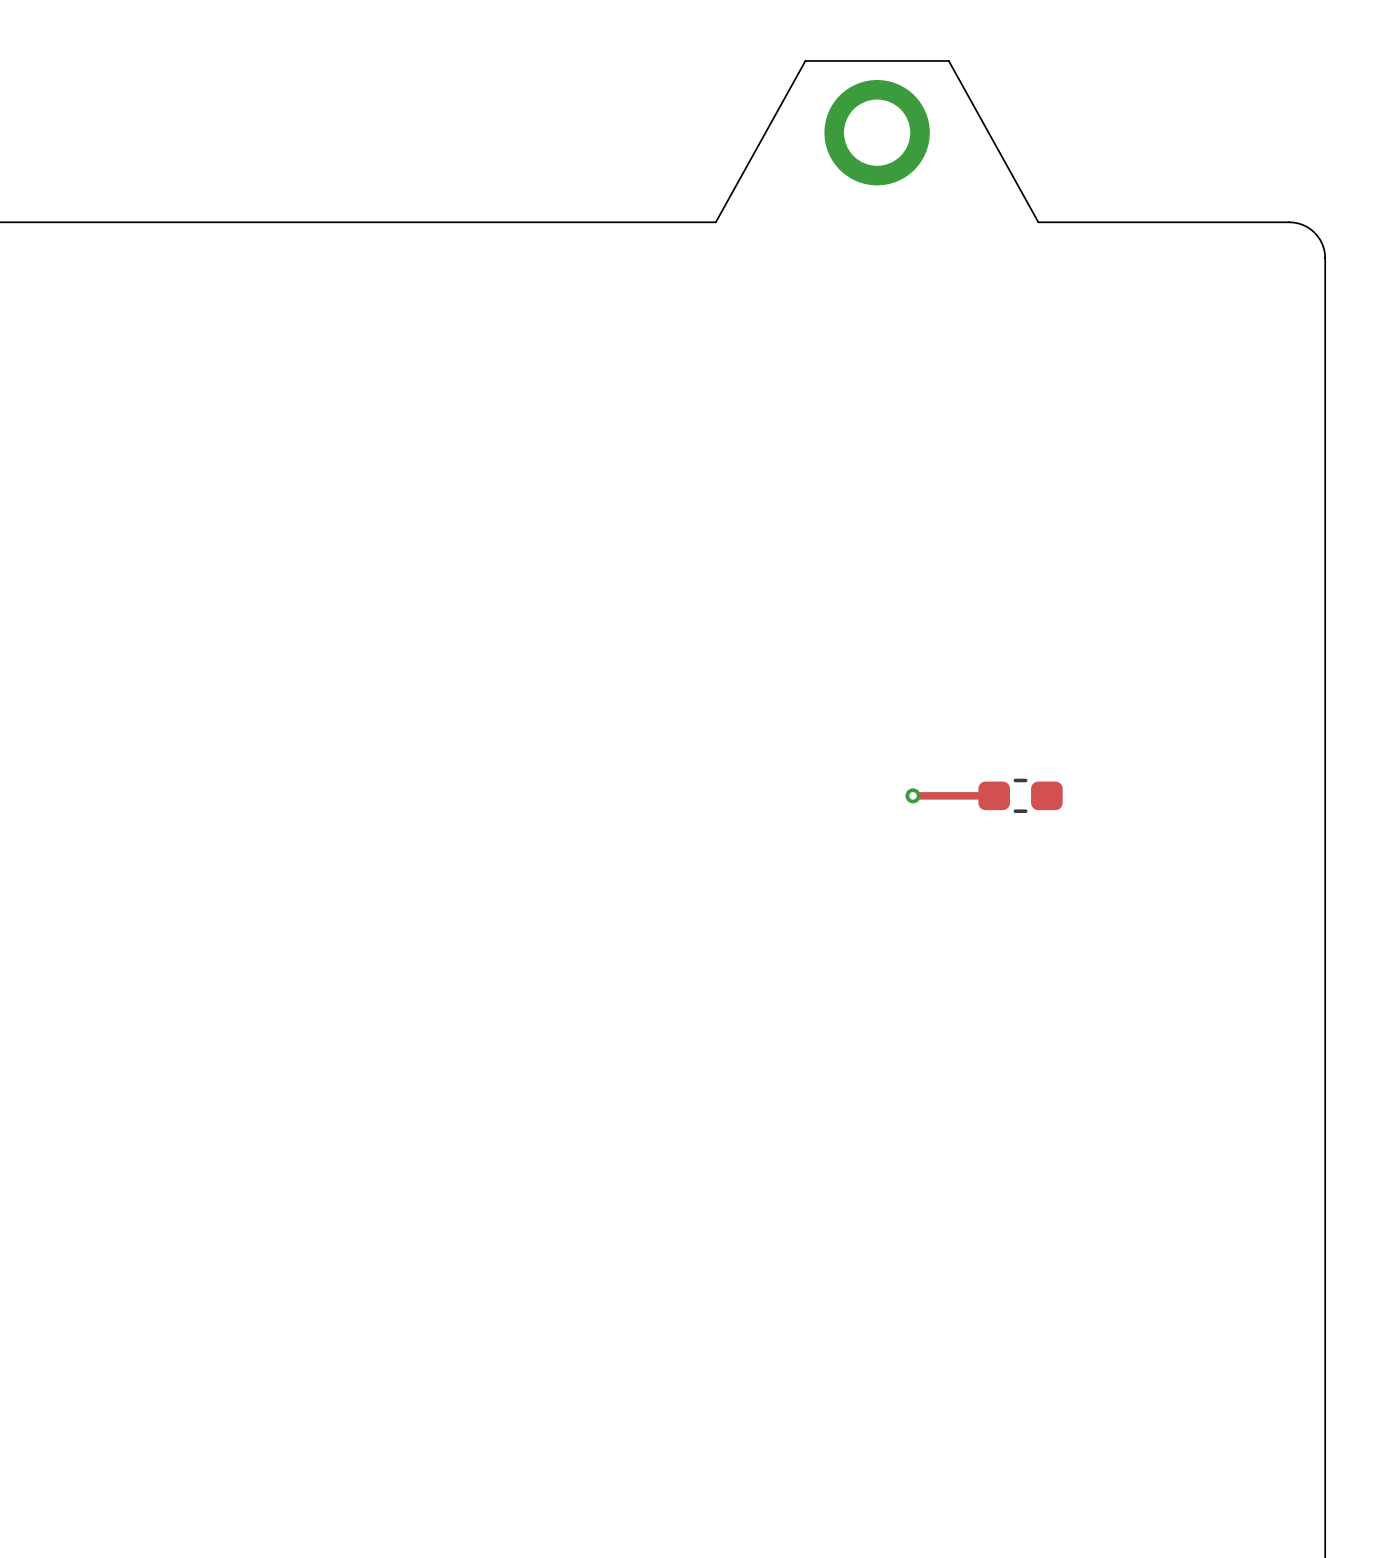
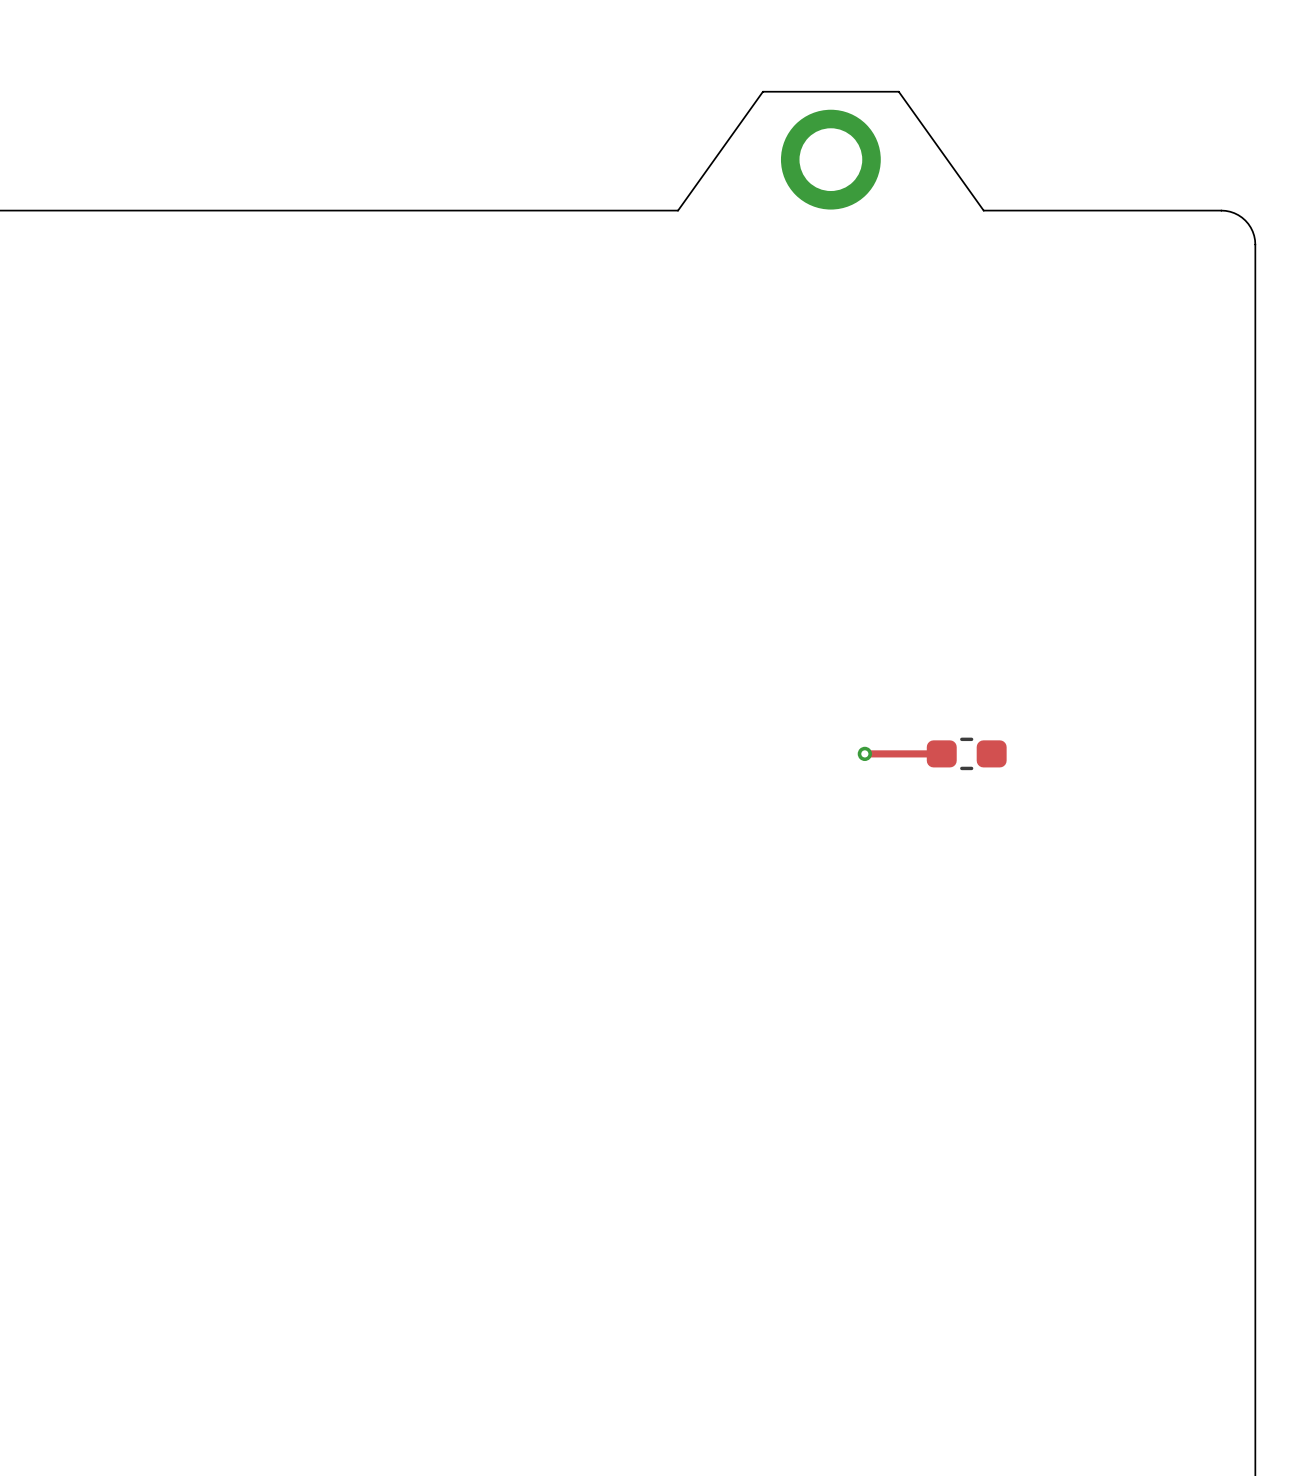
part position: (877, 132) -> (830, 159)
board edge: (715, 222) (805, 60) (948, 60) (1038, 222) -> (678, 210) (762, 91) (898, 91) (983, 210)

